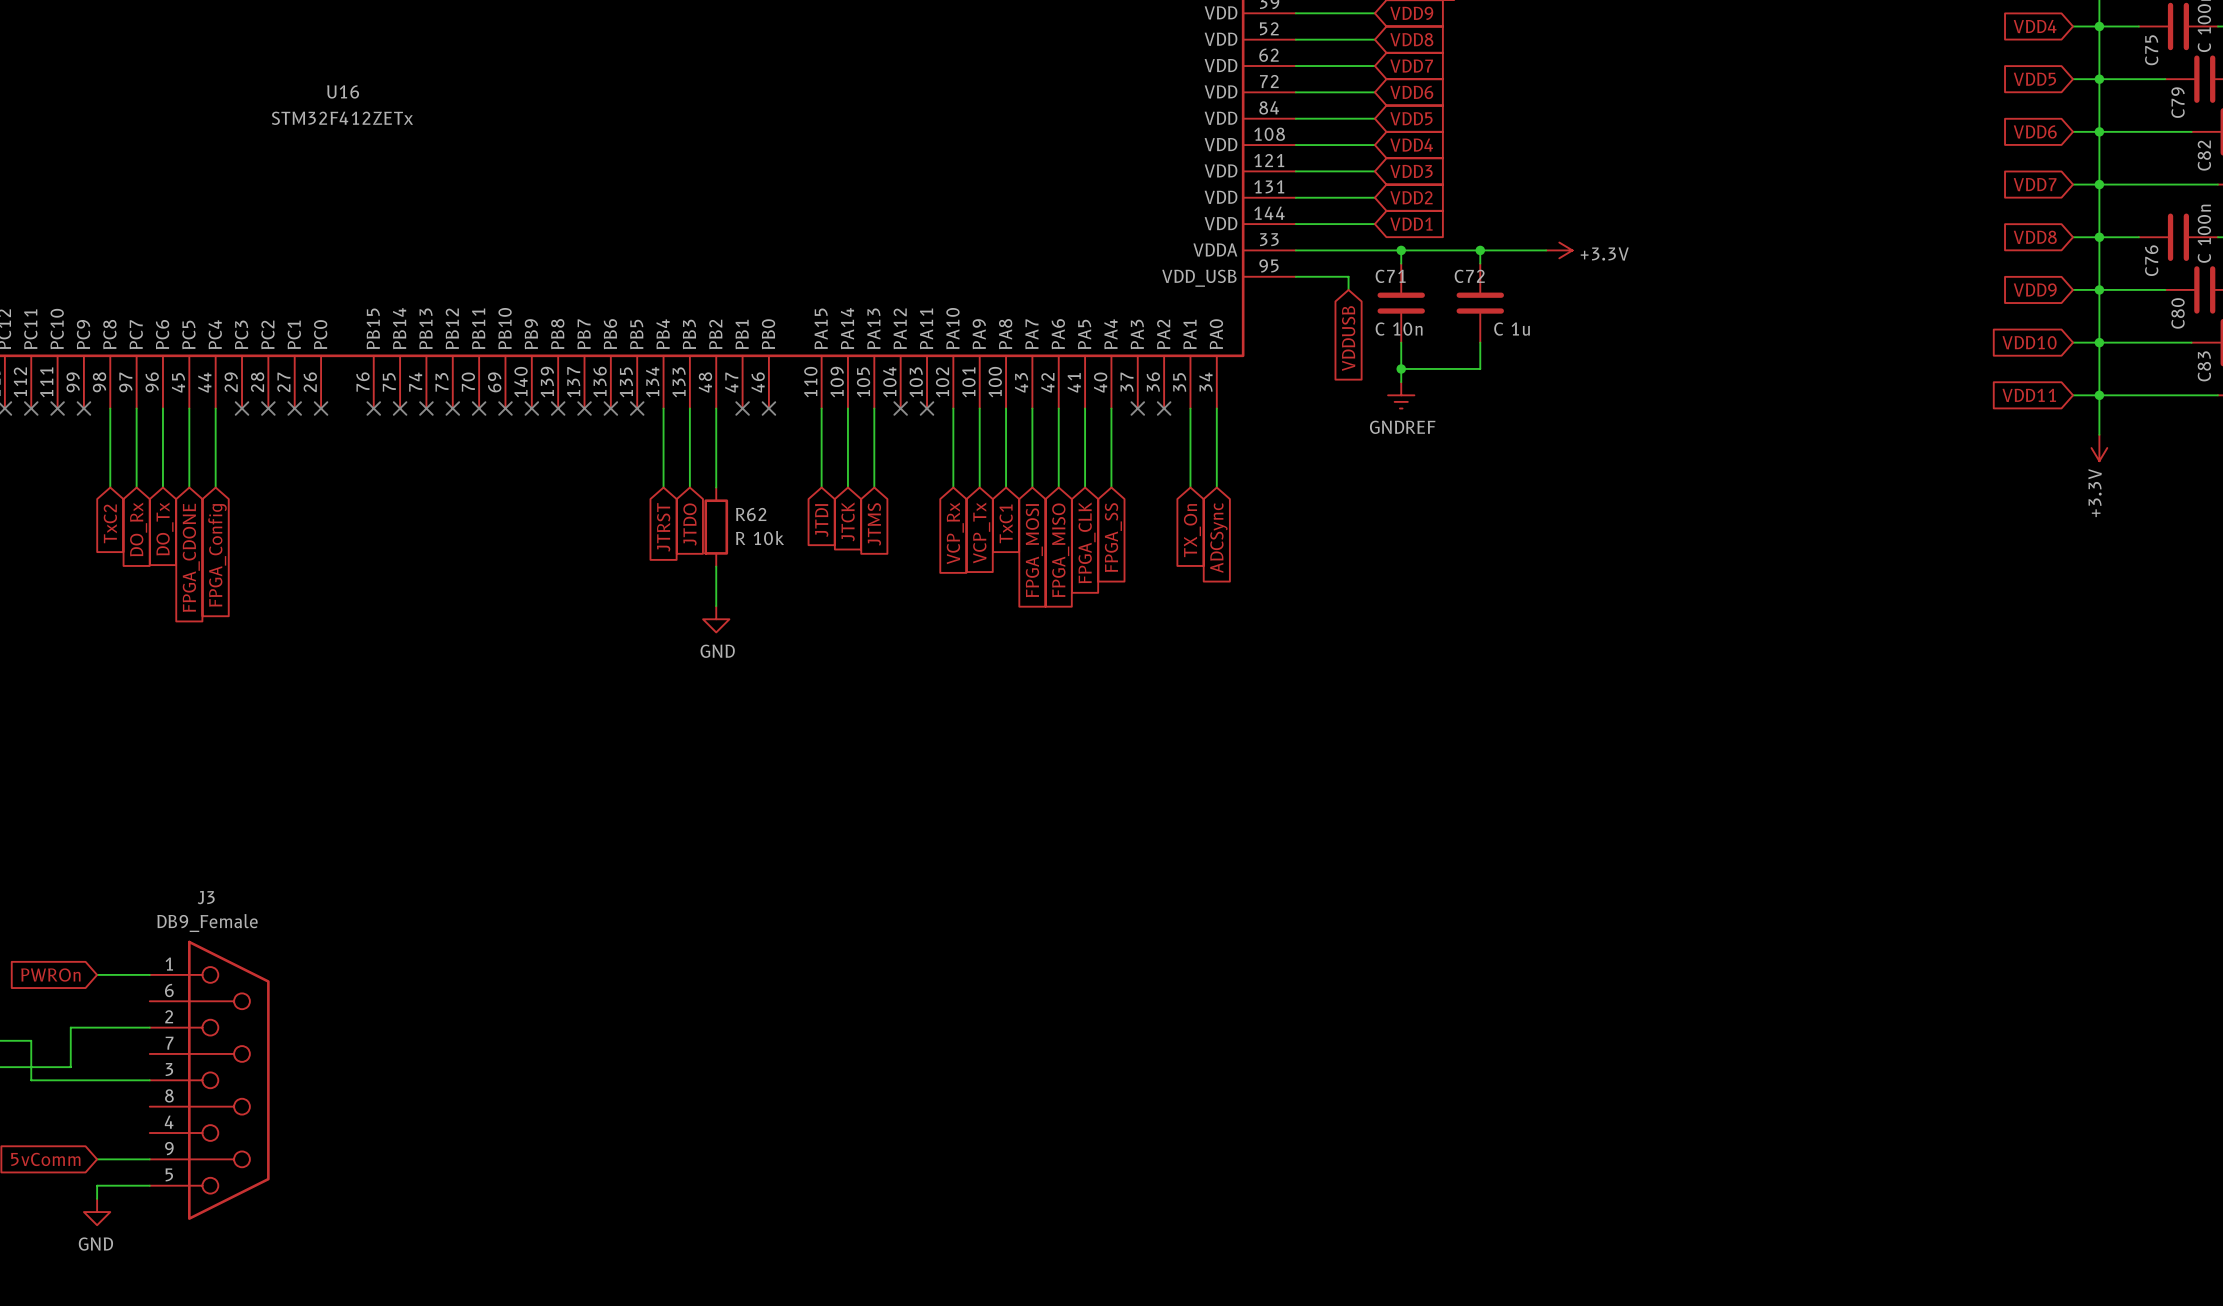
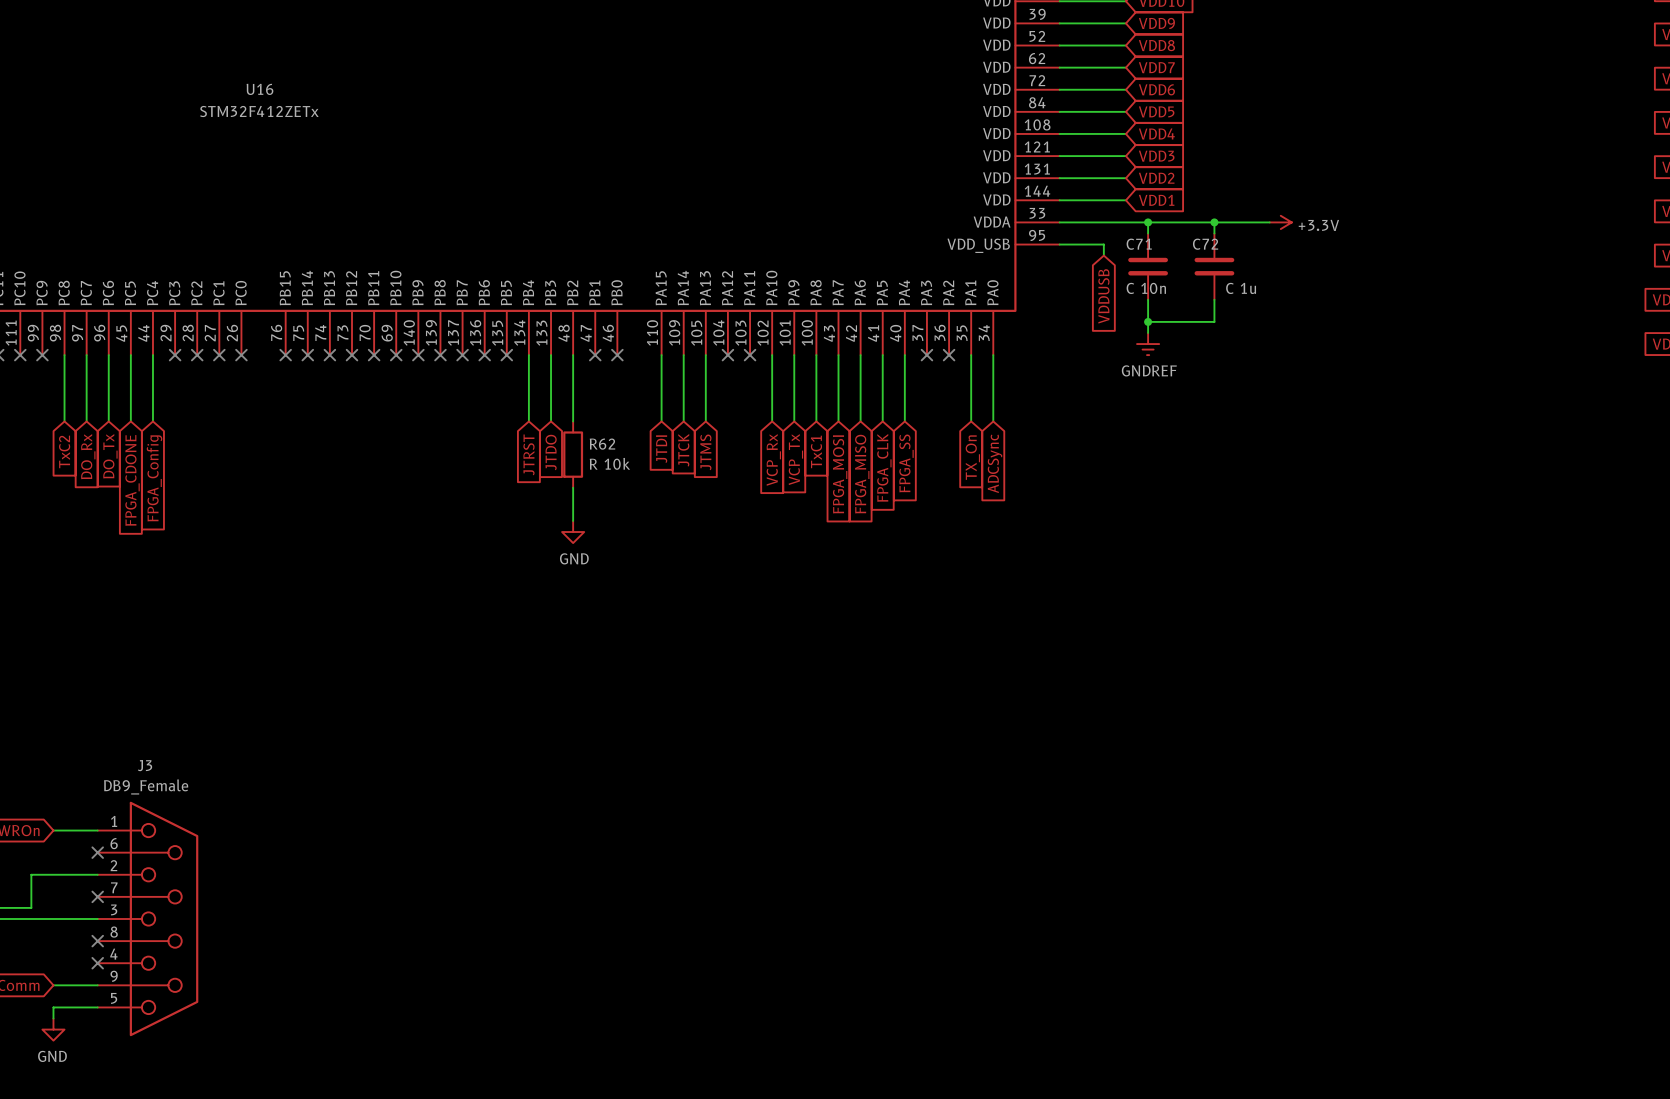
no-connect mark: none -> (97, 852)
no-connect mark: none -> (97, 896)
no-connect mark: none -> (97, 941)
no-connect mark: none -> (97, 963)

